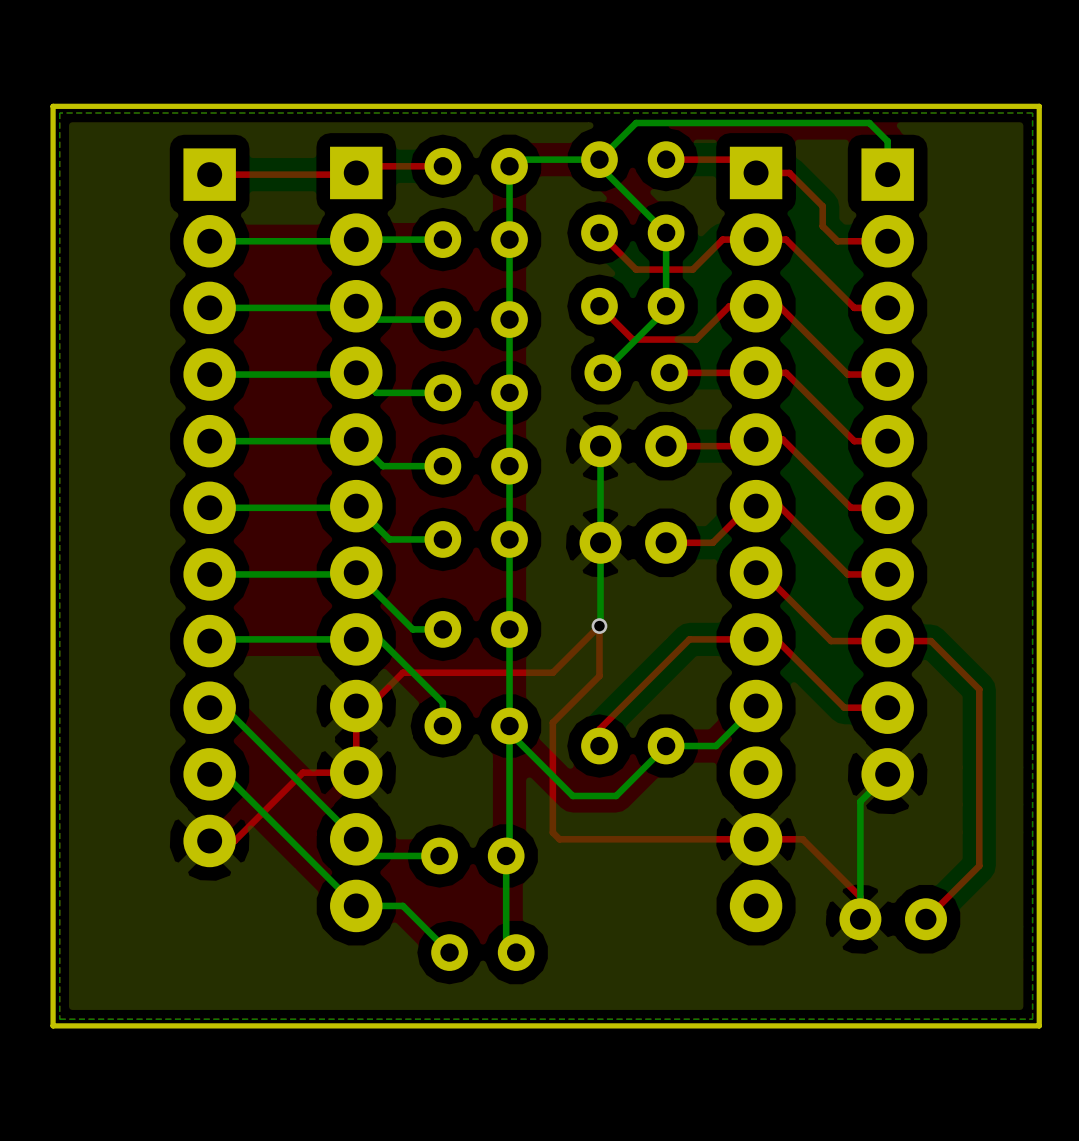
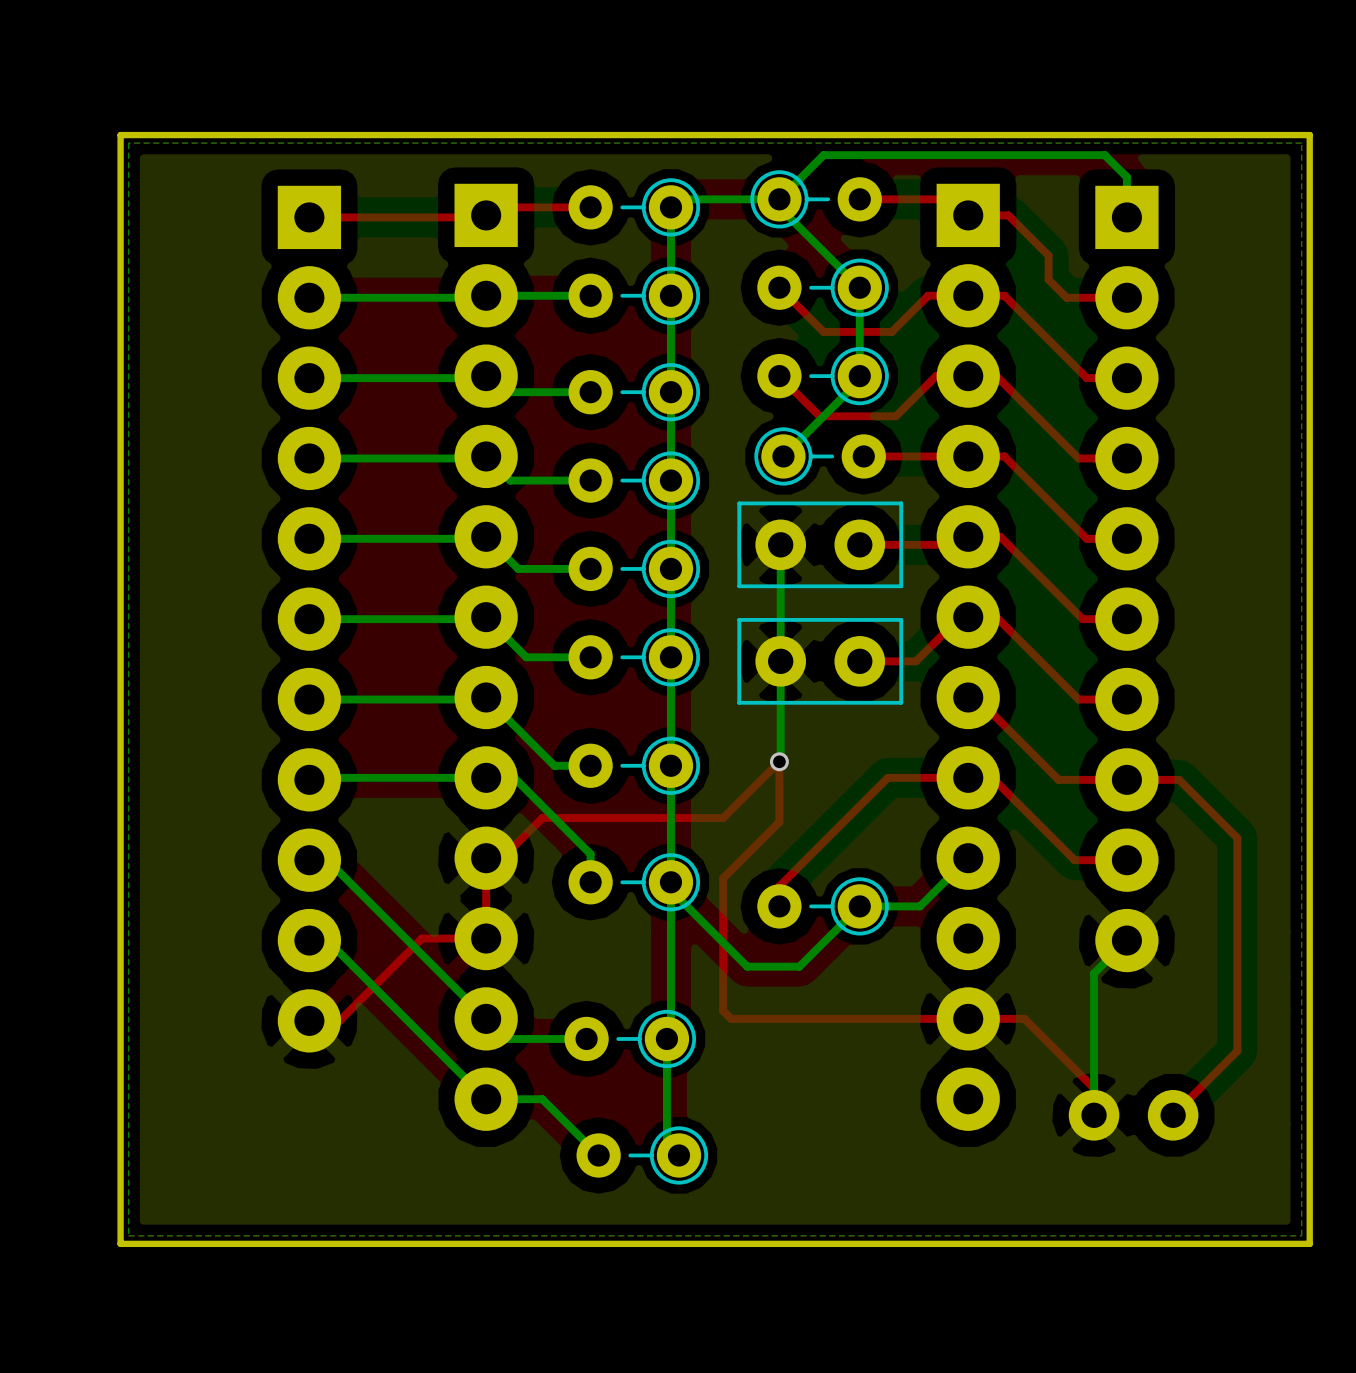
part side: top (632, 159) -> bottom (816, 199)
part side: top (476, 166) -> bottom (634, 207)
part side: top (632, 232) -> bottom (823, 287)
part side: top (476, 239) -> bottom (634, 295)
part side: top (632, 306) -> bottom (823, 376)
part side: top (476, 319) -> bottom (634, 392)
part side: top (636, 372) -> bottom (820, 456)
part side: top (476, 392) -> bottom (634, 480)
part side: top (633, 446) -> bottom (820, 544)
part side: top (476, 466) -> bottom (634, 568)
part side: top (476, 539) -> bottom (634, 657)
part side: top (633, 542) -> bottom (820, 661)
part side: top (476, 629) -> bottom (634, 765)
part side: top (476, 726) -> bottom (634, 882)
part side: top (632, 746) -> bottom (823, 906)
part side: top (472, 855) -> bottom (630, 1038)
part side: top (482, 952) -> bottom (642, 1155)

